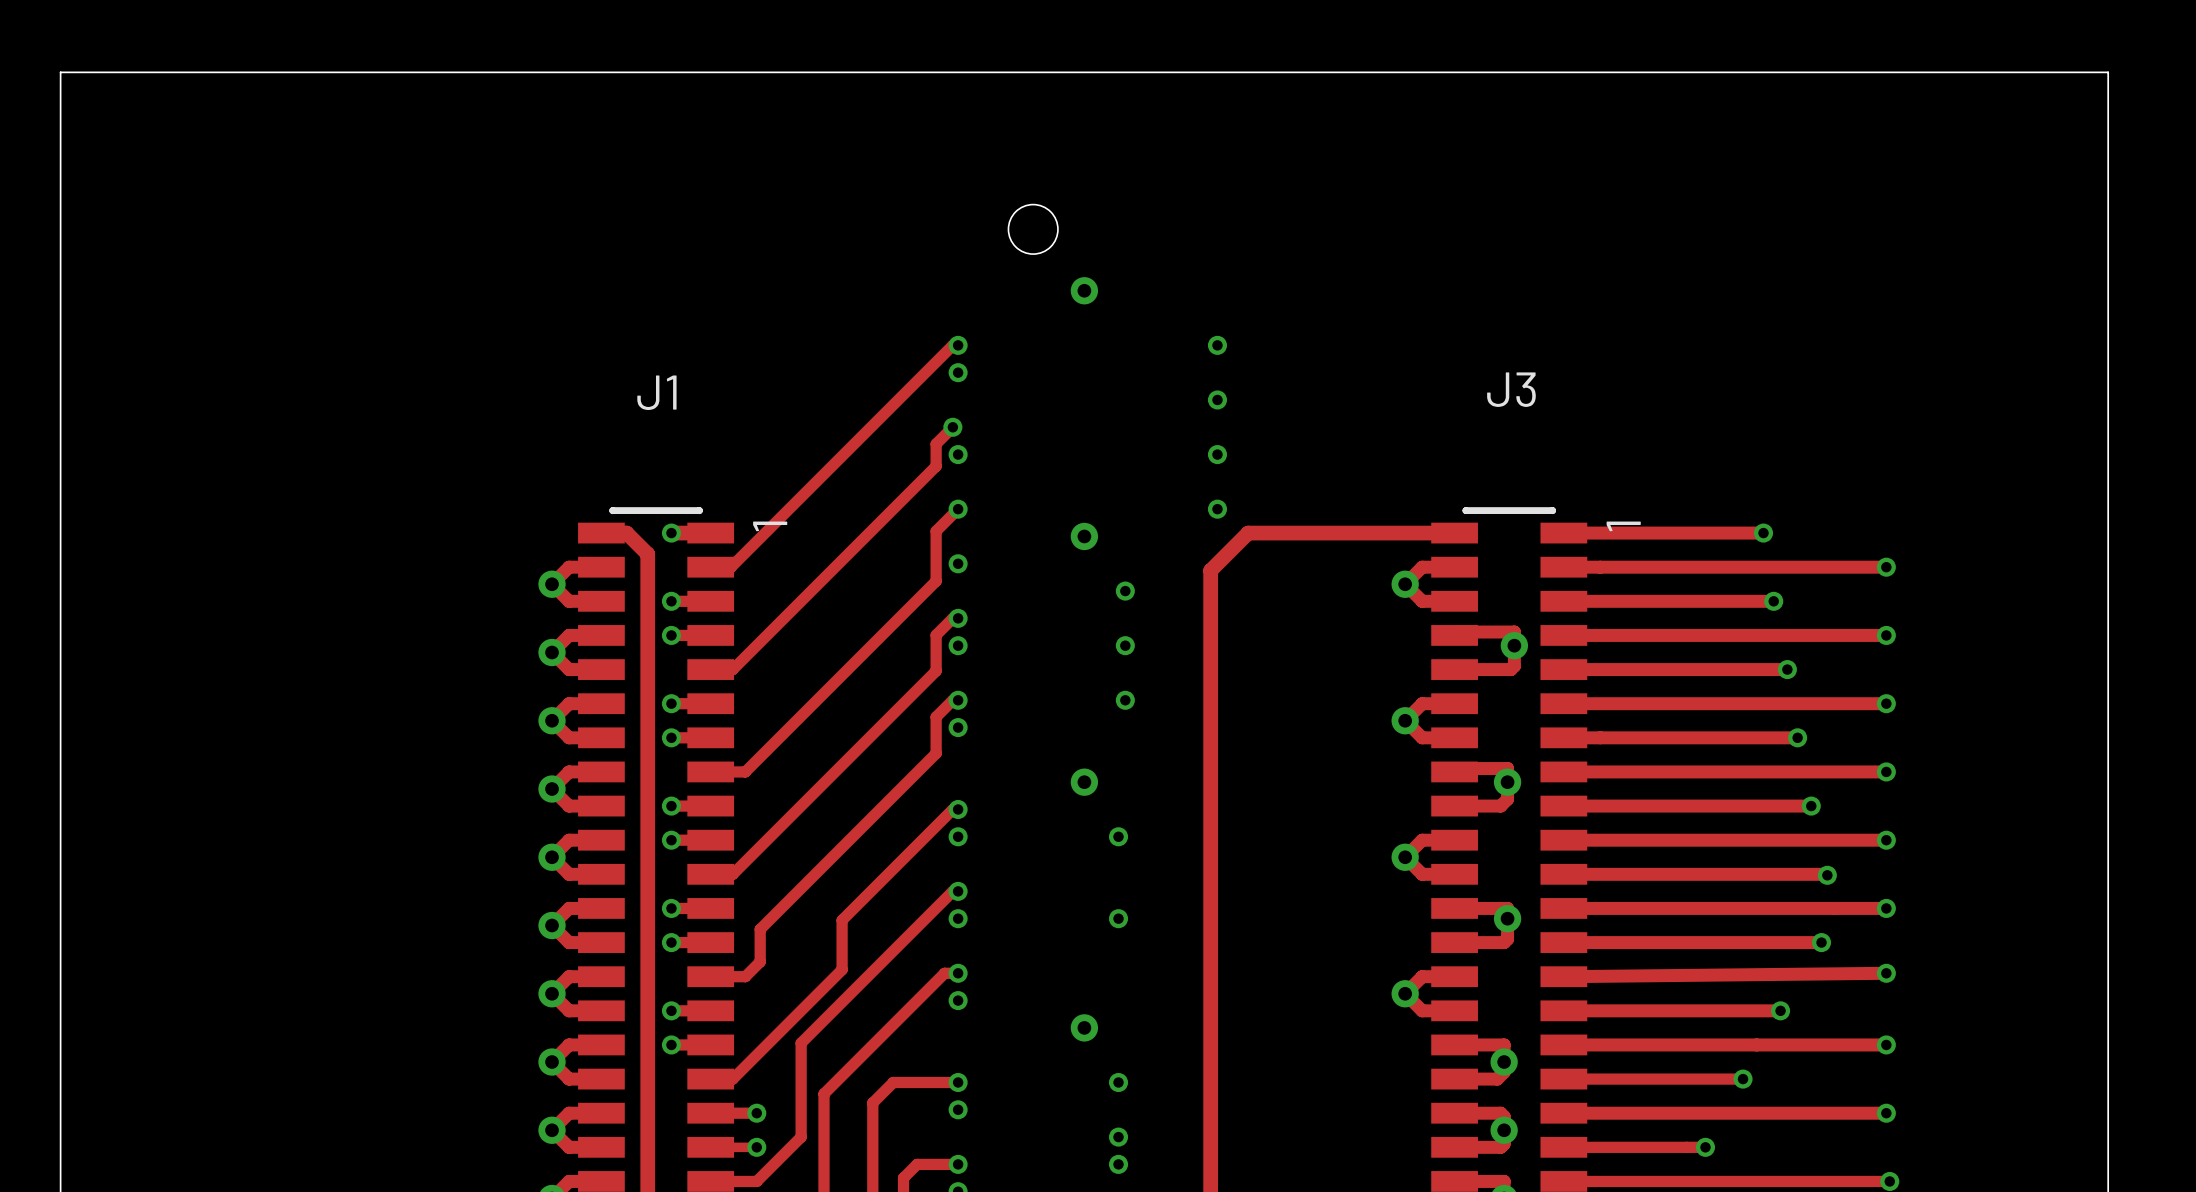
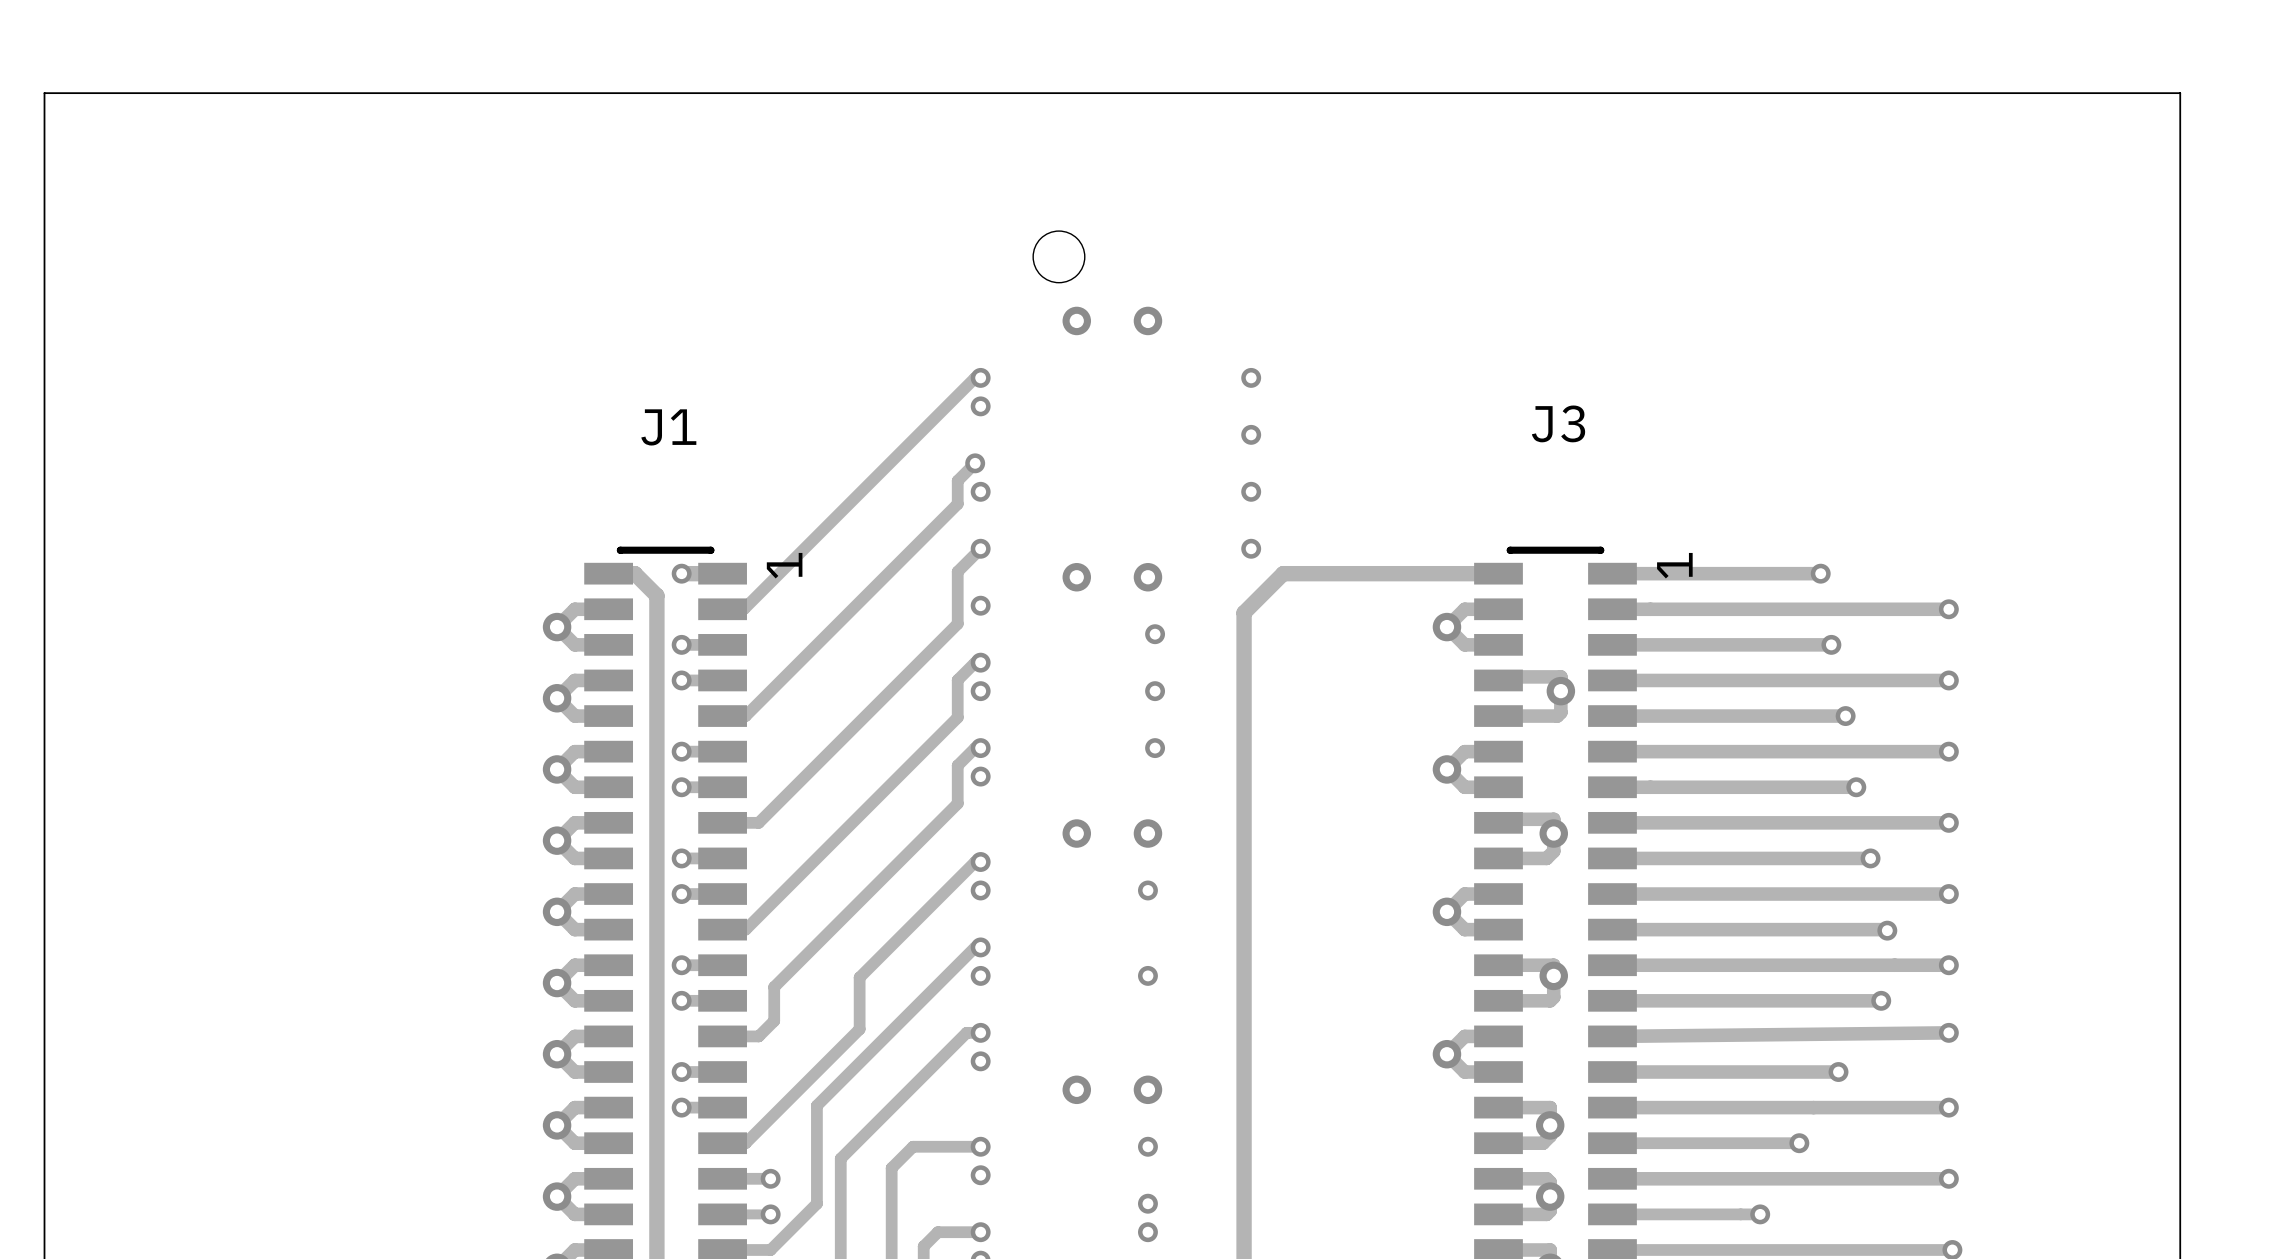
via: none -> (1076, 320)
via: (1084, 290) -> none
via: none -> (1147, 320)
via: none -> (1076, 577)
via: (1084, 536) -> none
via: none -> (1147, 577)
via: none -> (1076, 833)
via: (1084, 782) -> none
via: none -> (1147, 833)
via: none -> (1076, 1089)
via: (1084, 1027) -> none
via: none -> (1147, 1089)

